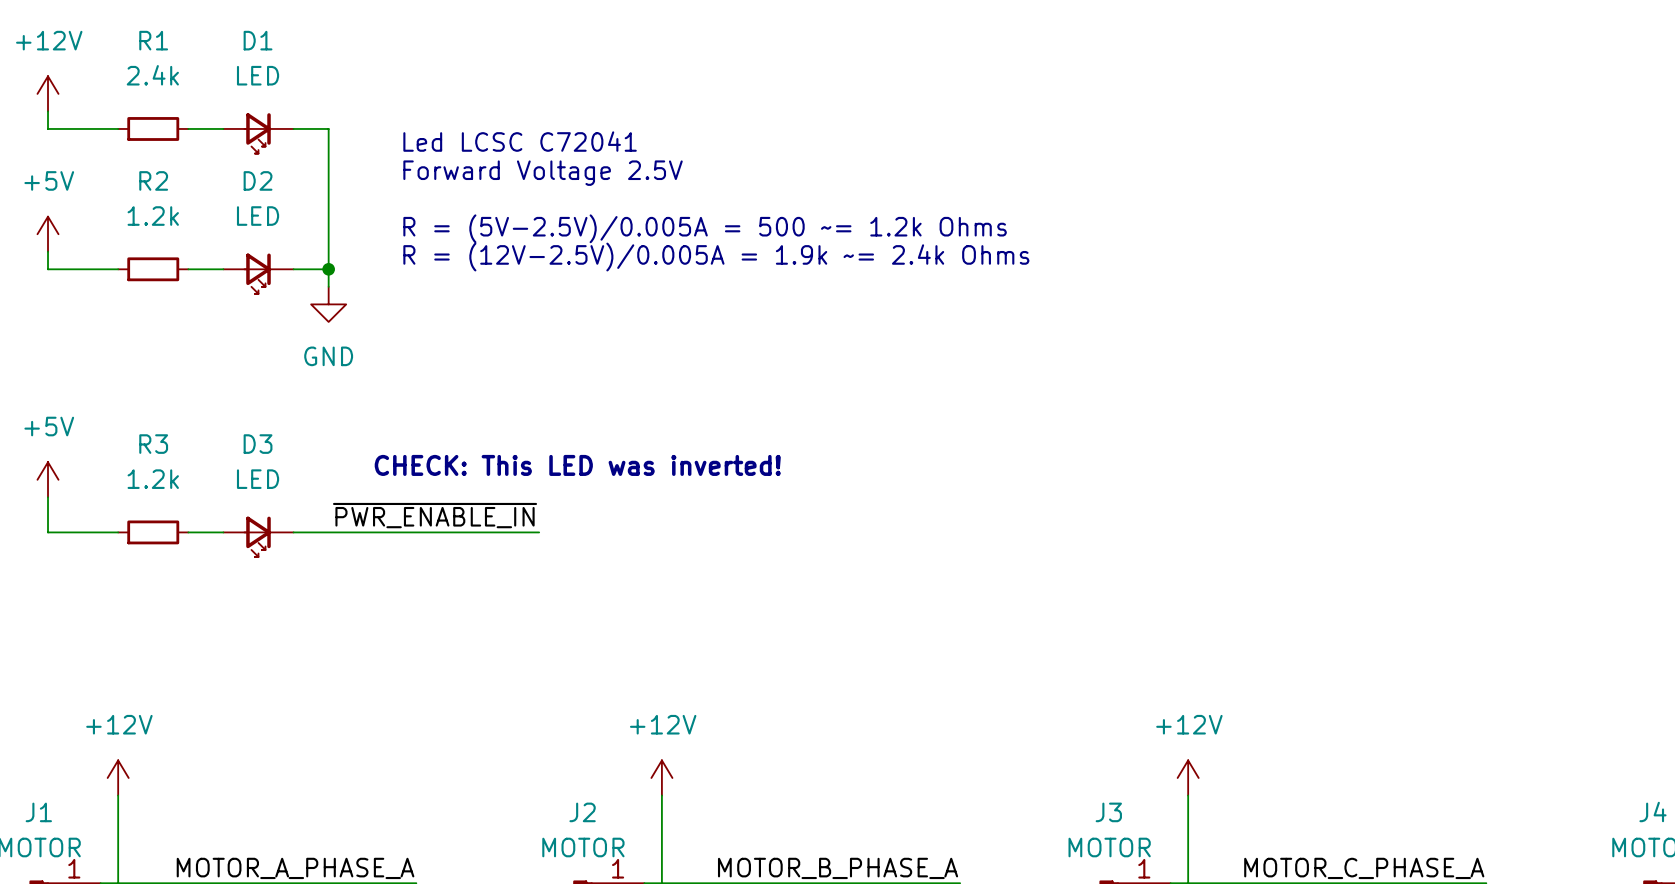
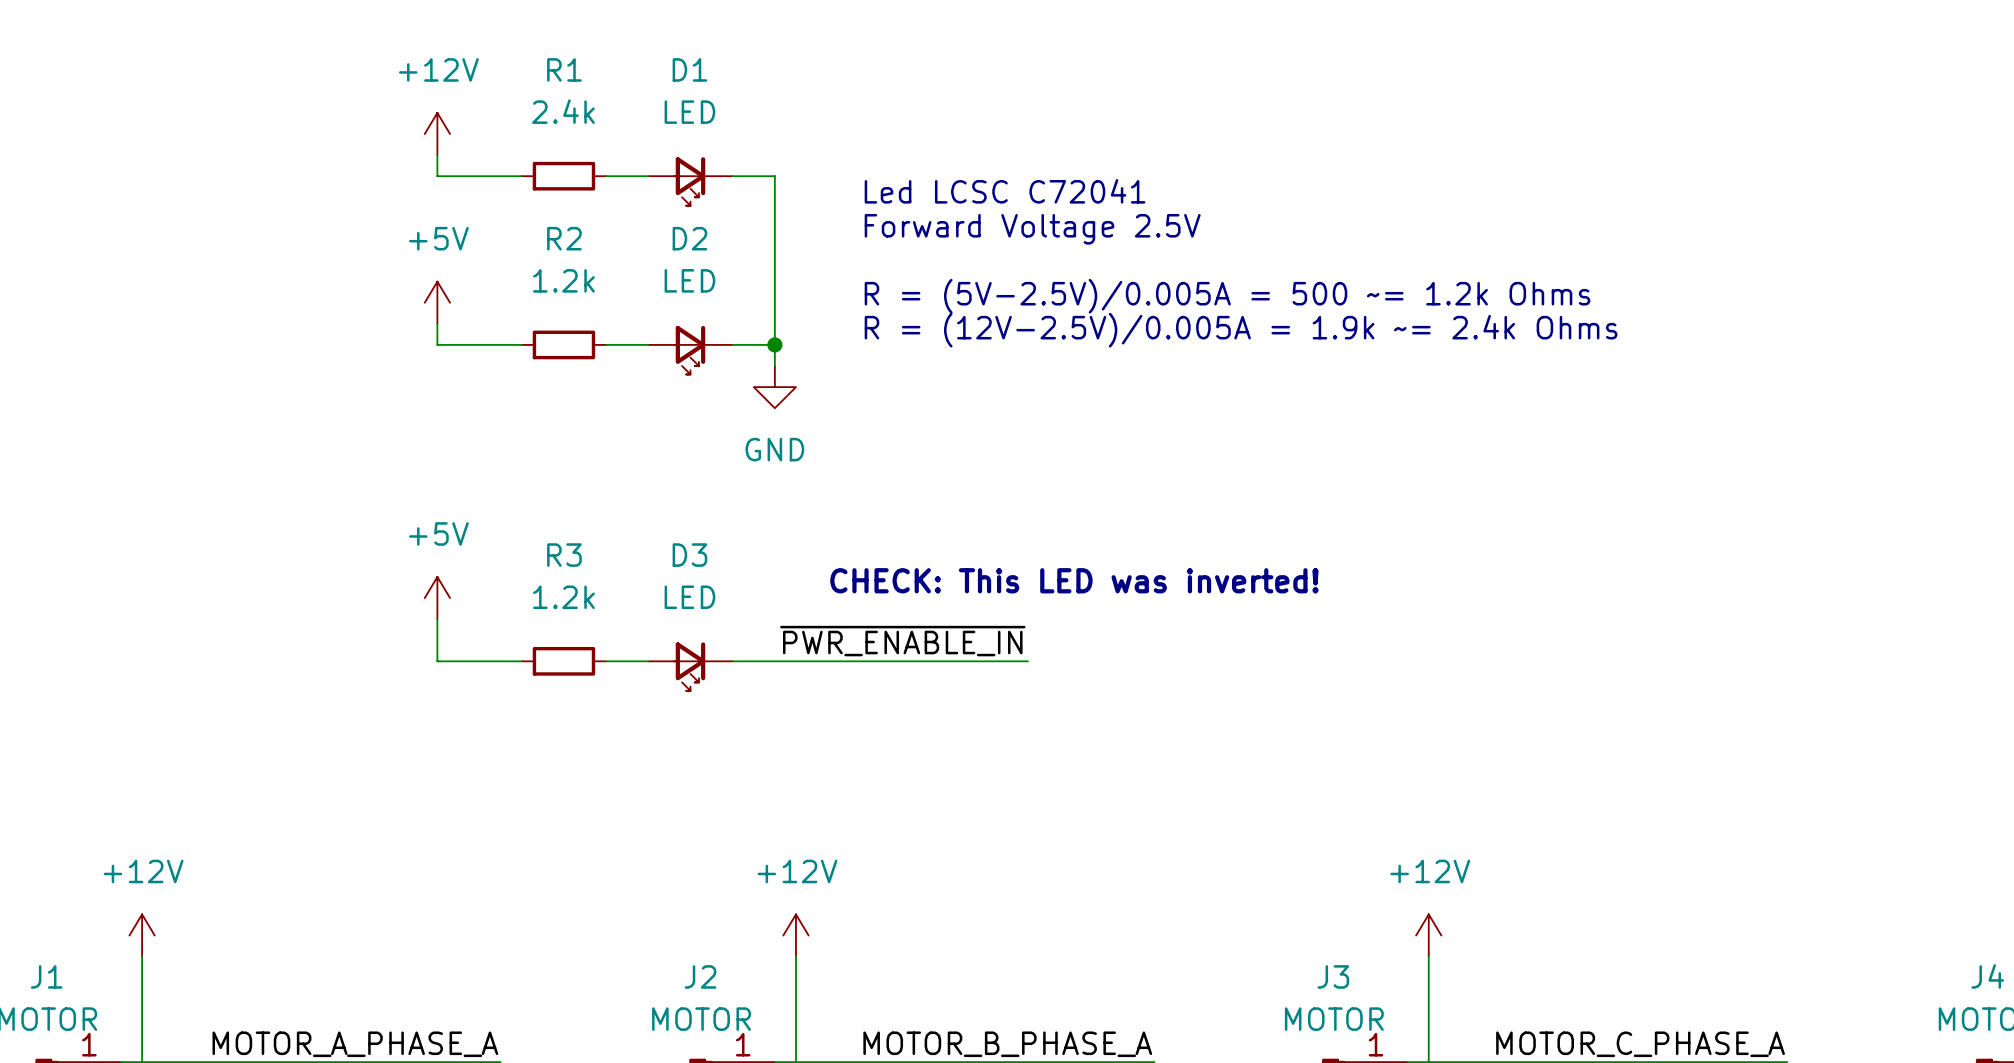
power symbol position: +12V (48, 93) -> +12V (437, 134)
wire: (48, 111) (48, 128) (118, 128) -> (437, 155) (437, 176) (521, 176)
R1 position: (153, 128) -> (563, 176)
wire: (188, 128) (223, 128) -> (606, 176) (648, 176)
wire: (293, 128) (328, 128) (328, 286) -> (732, 176) (774, 176) (774, 366)
D1 position: (258, 133) -> (690, 181)
text position: Led LCSC C72041 (520, 141) -> Led LCSC C72041 (1005, 191)
text position: Forward Voltage 2.5V (543, 173) -> Forward Voltage 2.5V (1032, 229)
text position: R = (5V-2.5V)/0.005A = 500 ~= 1.2k Ohms (705, 228) -> R = (5V-2.5V)/0.005A = 500 ~= 1.2k Ohms (1227, 296)
power symbol: +5V (48, 234) -> none
wire: (48, 251) (48, 269) (118, 269) -> (437, 323) (437, 344) (521, 344)
power symbol: none -> +5V (437, 302)
text position: R = (12V-2.5V)/0.005A = 1.9k ~= 2.4k Ohms (716, 257) -> R = (12V-2.5V)/0.005A = 1.9k ~= 2.4k Ohms (1241, 330)
R2 position: (153, 269) -> (563, 344)
wire: (188, 269) (223, 269) -> (606, 344) (648, 344)
wire: (293, 269) (328, 269) -> (732, 344) (774, 344)
junction: (328, 269) -> none
D2 position: (258, 273) -> (690, 350)
junction: none -> (774, 344)
power symbol: GND (328, 304) -> none
power symbol: none -> GND (774, 387)
text position: CHECK: This LED was inverted! (577, 465) -> CHECK: This LED was inverted! (1074, 580)
power symbol: +5V (48, 479) -> none
wire: (48, 497) (48, 532) (118, 532) -> (437, 619) (437, 661) (521, 661)
power symbol: none -> +5V (437, 598)
label position: ~{PWR_ENABLE_IN} (435, 515) -> ~{PWR_ENABLE_IN} (902, 641)
R3 position: (153, 532) -> (563, 661)
wire: (188, 532) (223, 532) -> (606, 661) (648, 661)
wire: (293, 532) (539, 532) -> (732, 661) (1027, 661)
D3 position: (258, 536) -> (690, 666)

